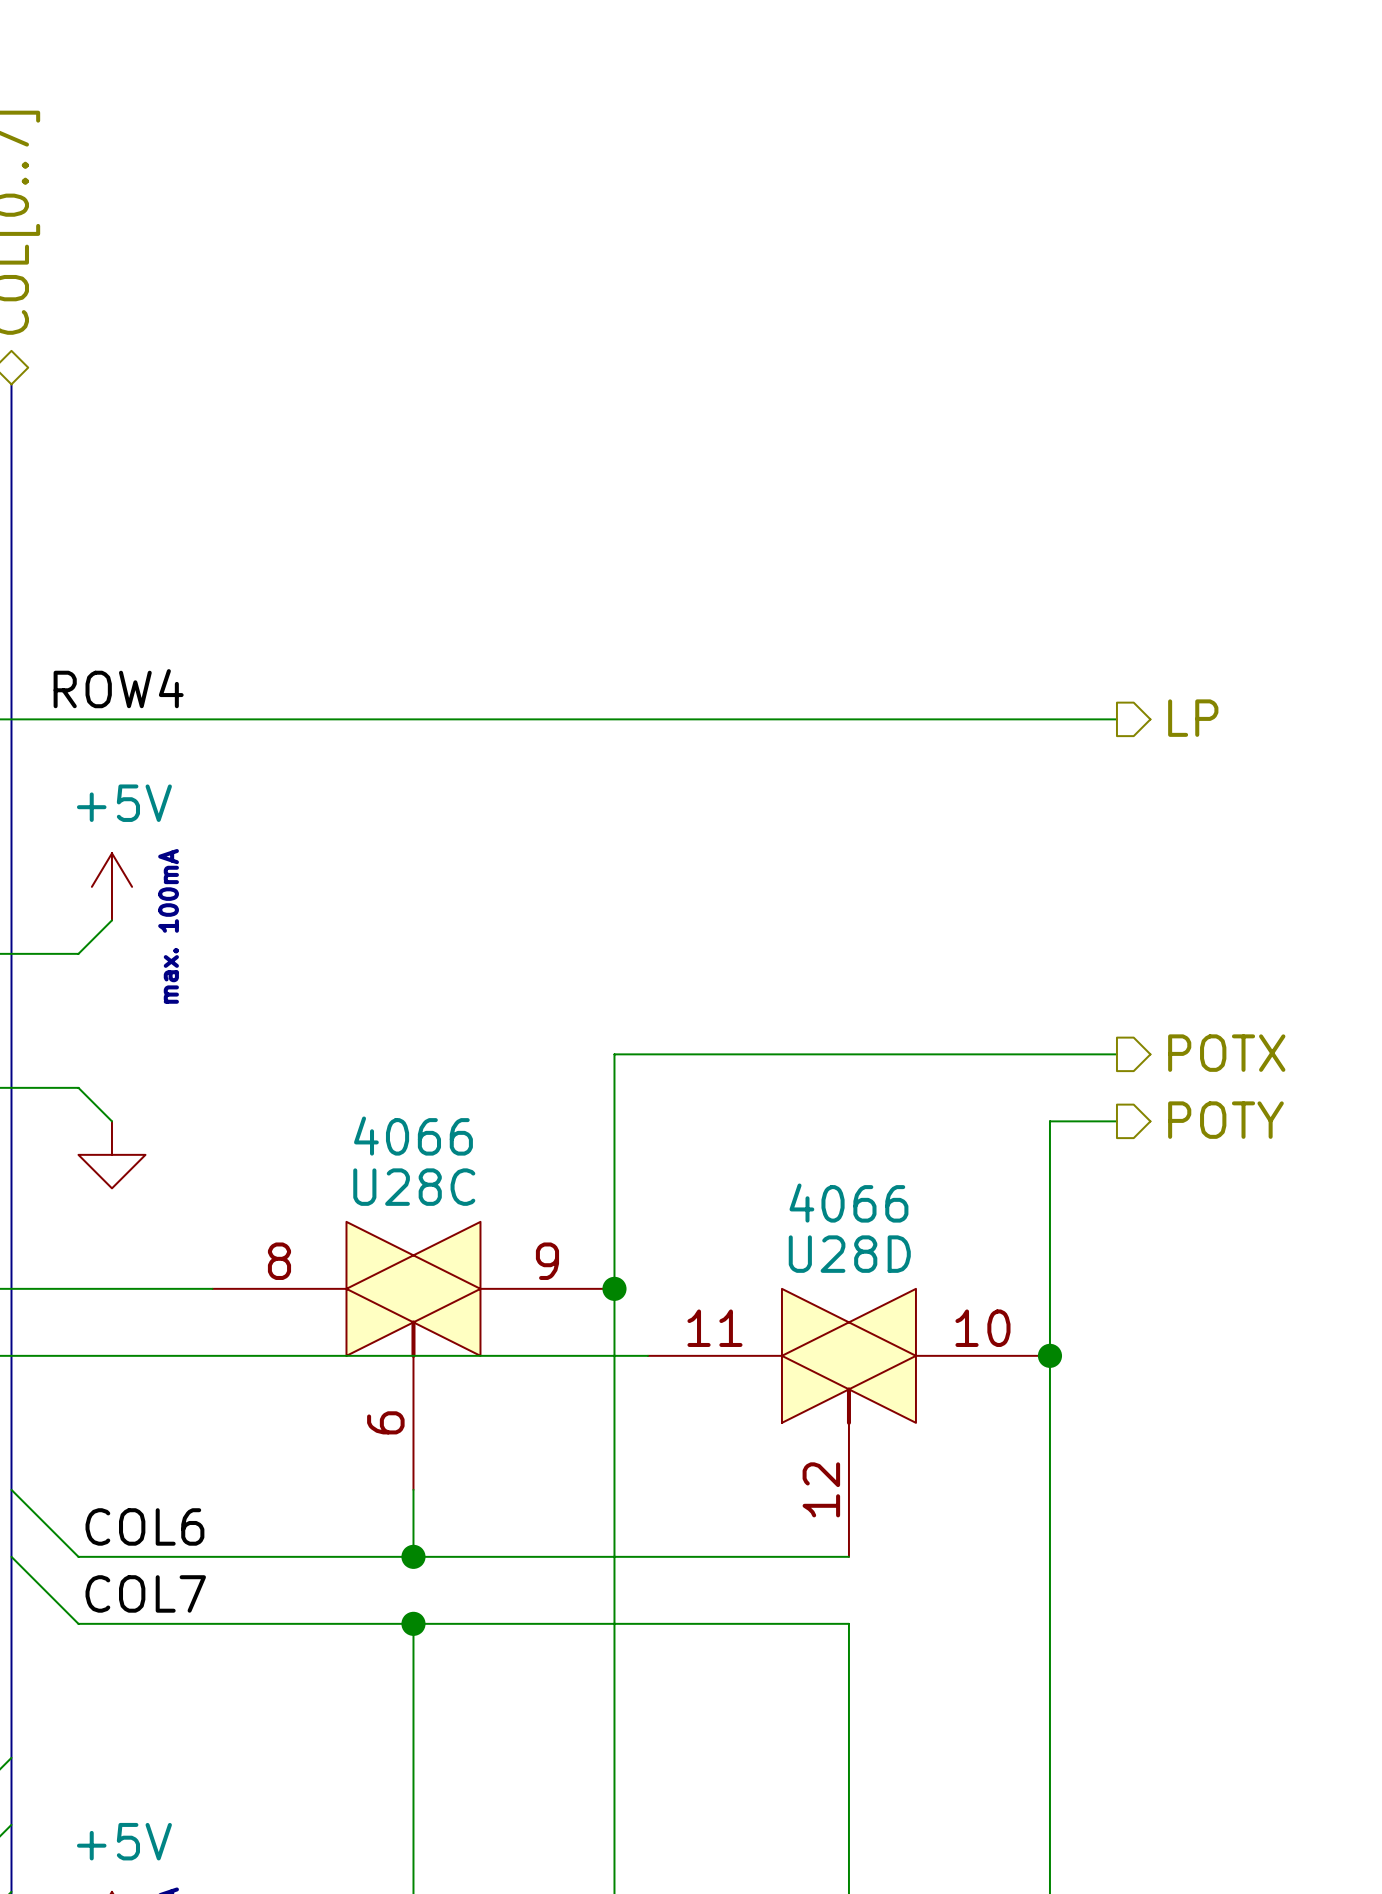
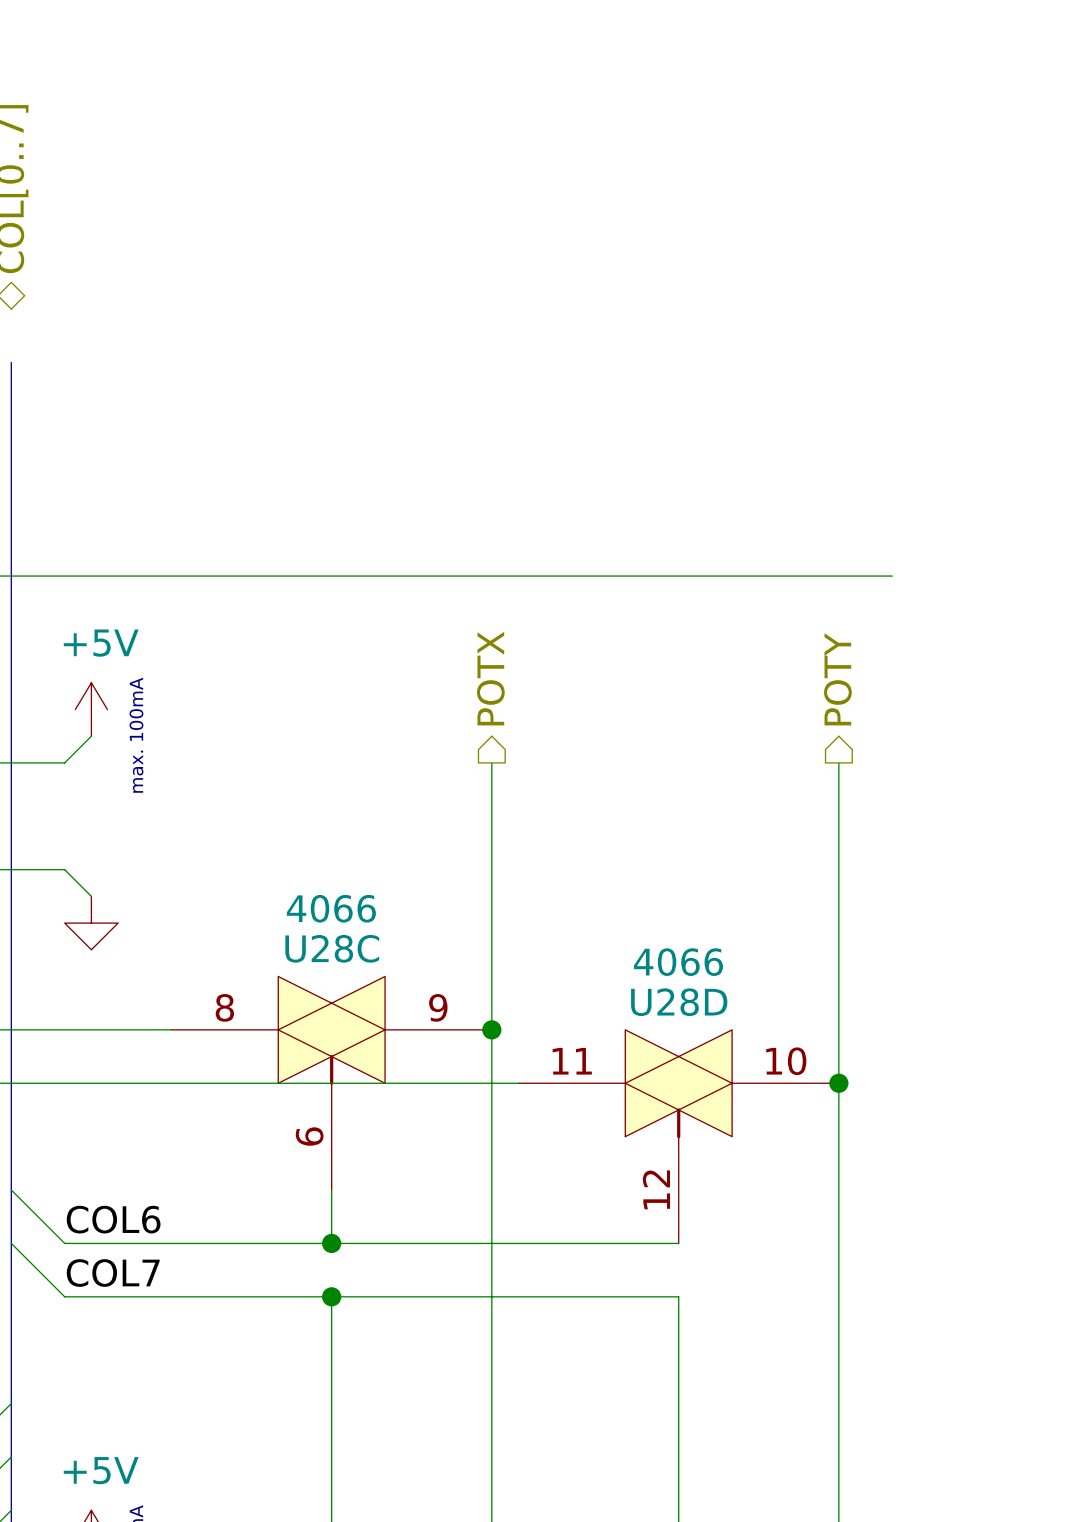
bus: (11, 384) (11, 451) -> none
label: ROW4 (118, 688) -> none
hierarchical label: LP (1193, 718) -> none
hierarchical label rotation: 0° (1226, 1053) -> 90° counterclockwise (490, 678)
hierarchical label position: POTX (1226, 1053) -> POTX (490, 678)
wire: (614, 1054) (1116, 1054) -> (491, 843) (491, 762)
hierarchical label rotation: 0° (1225, 1120) -> 90° counterclockwise (837, 679)
hierarchical label position: POTY (1225, 1120) -> POTY (837, 679)
wire: (1049, 1121) (1116, 1121) -> (838, 896) (838, 762)

